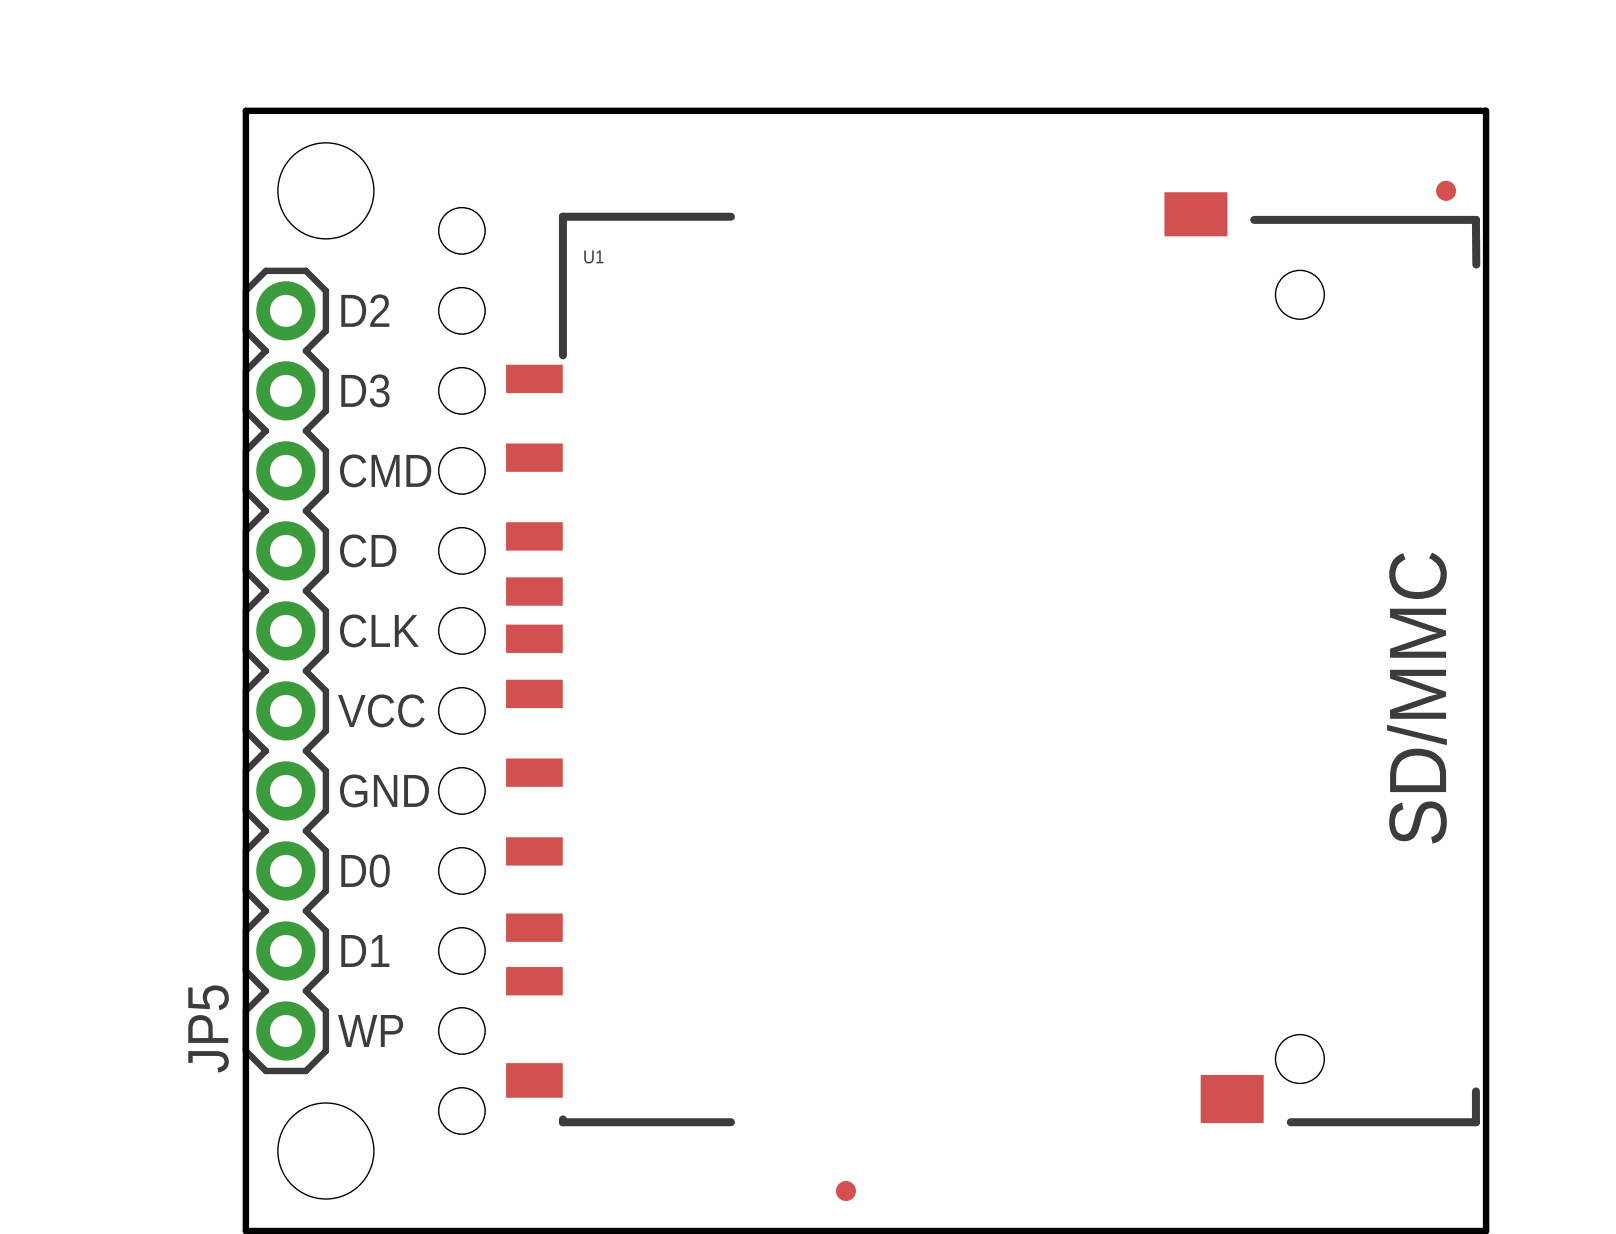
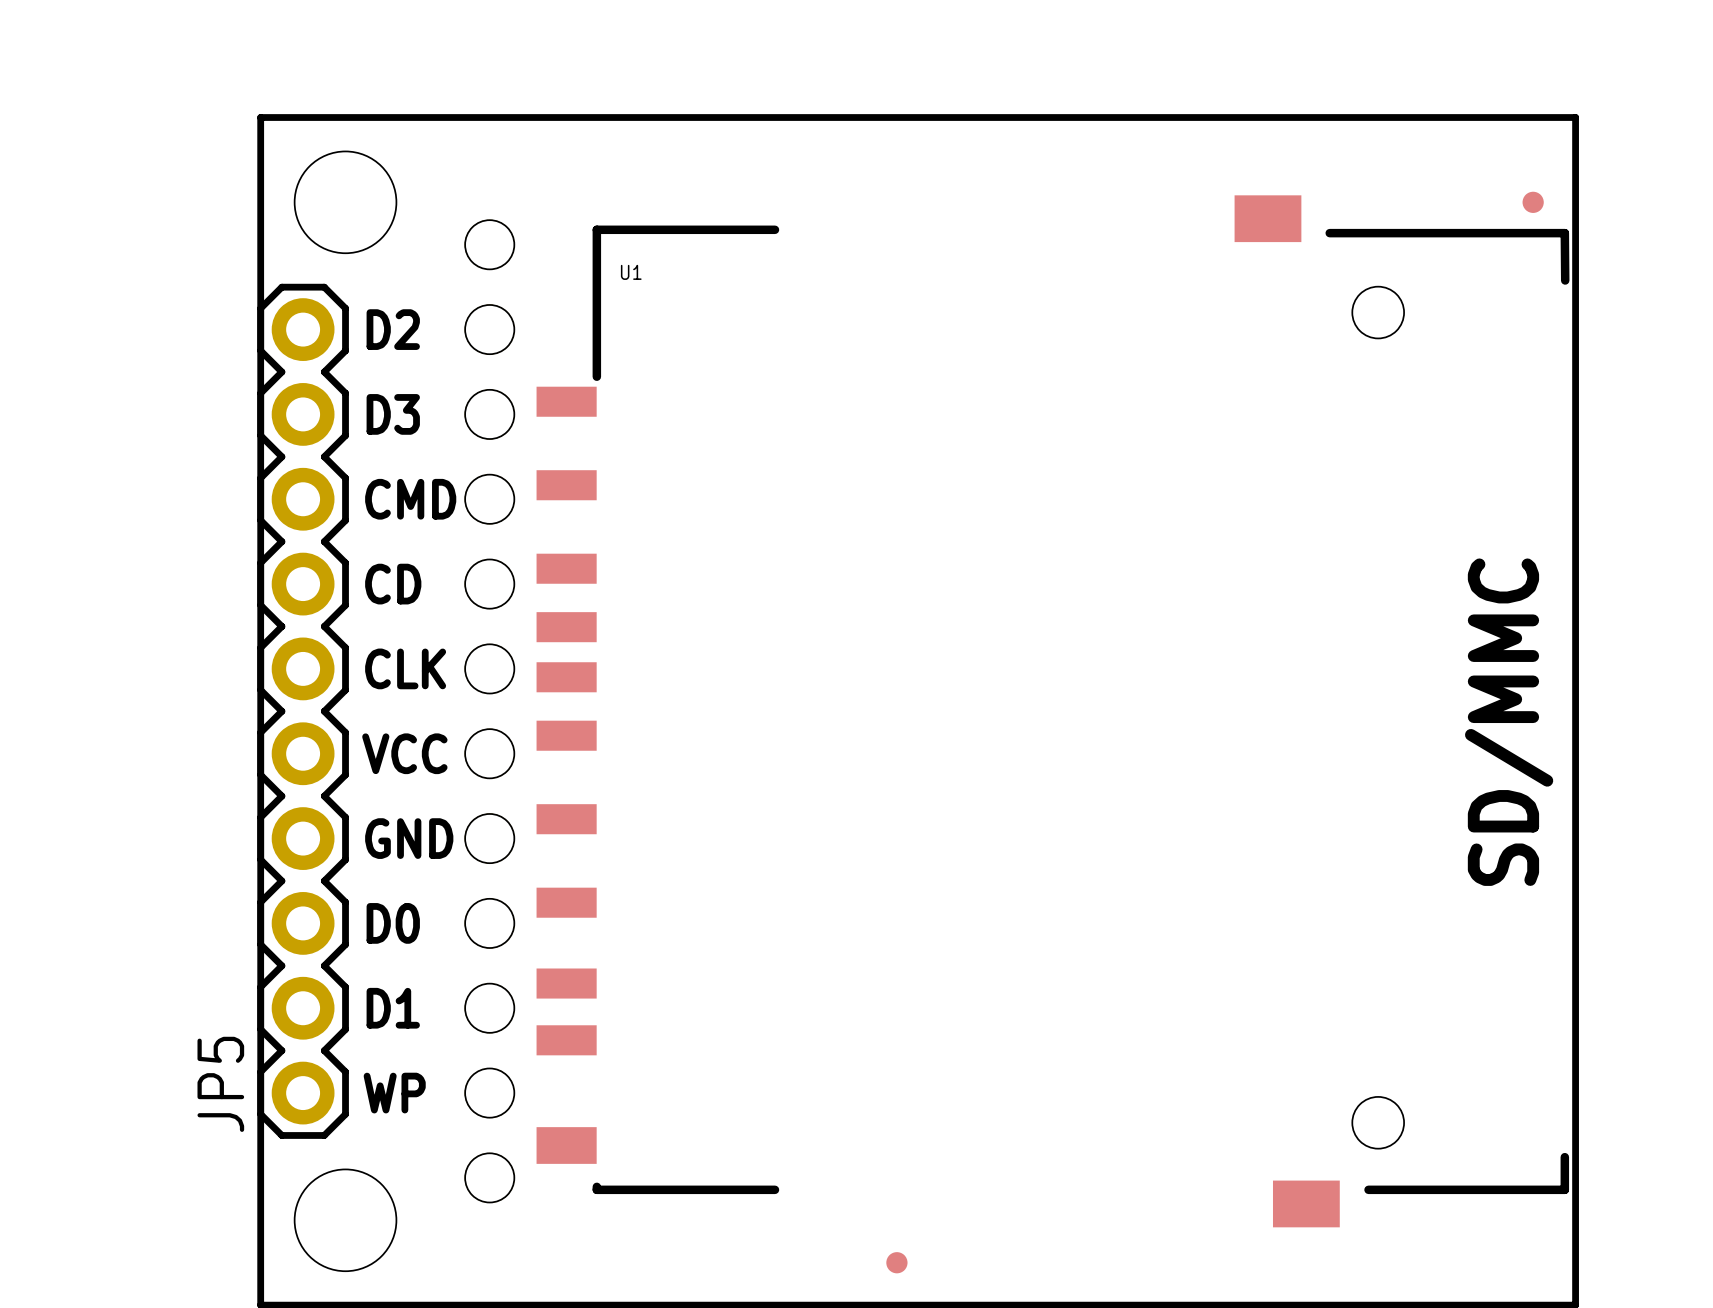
U1 footprint: [506, 192, 1481, 1127] -> [536, 195, 1570, 1228]

